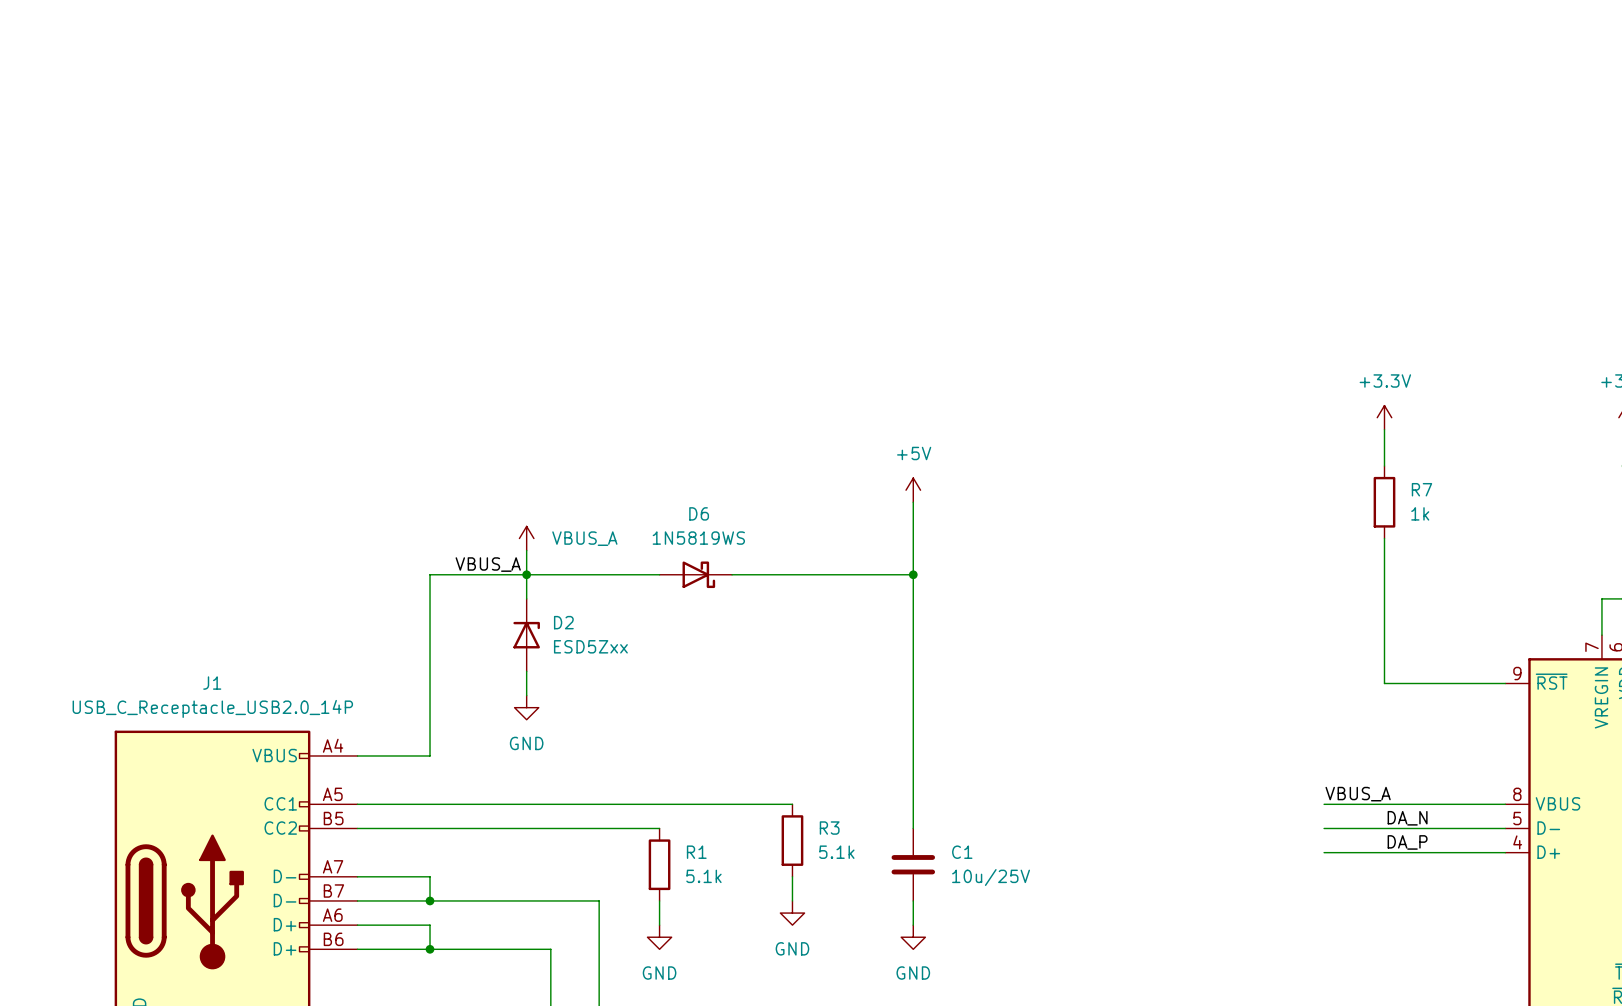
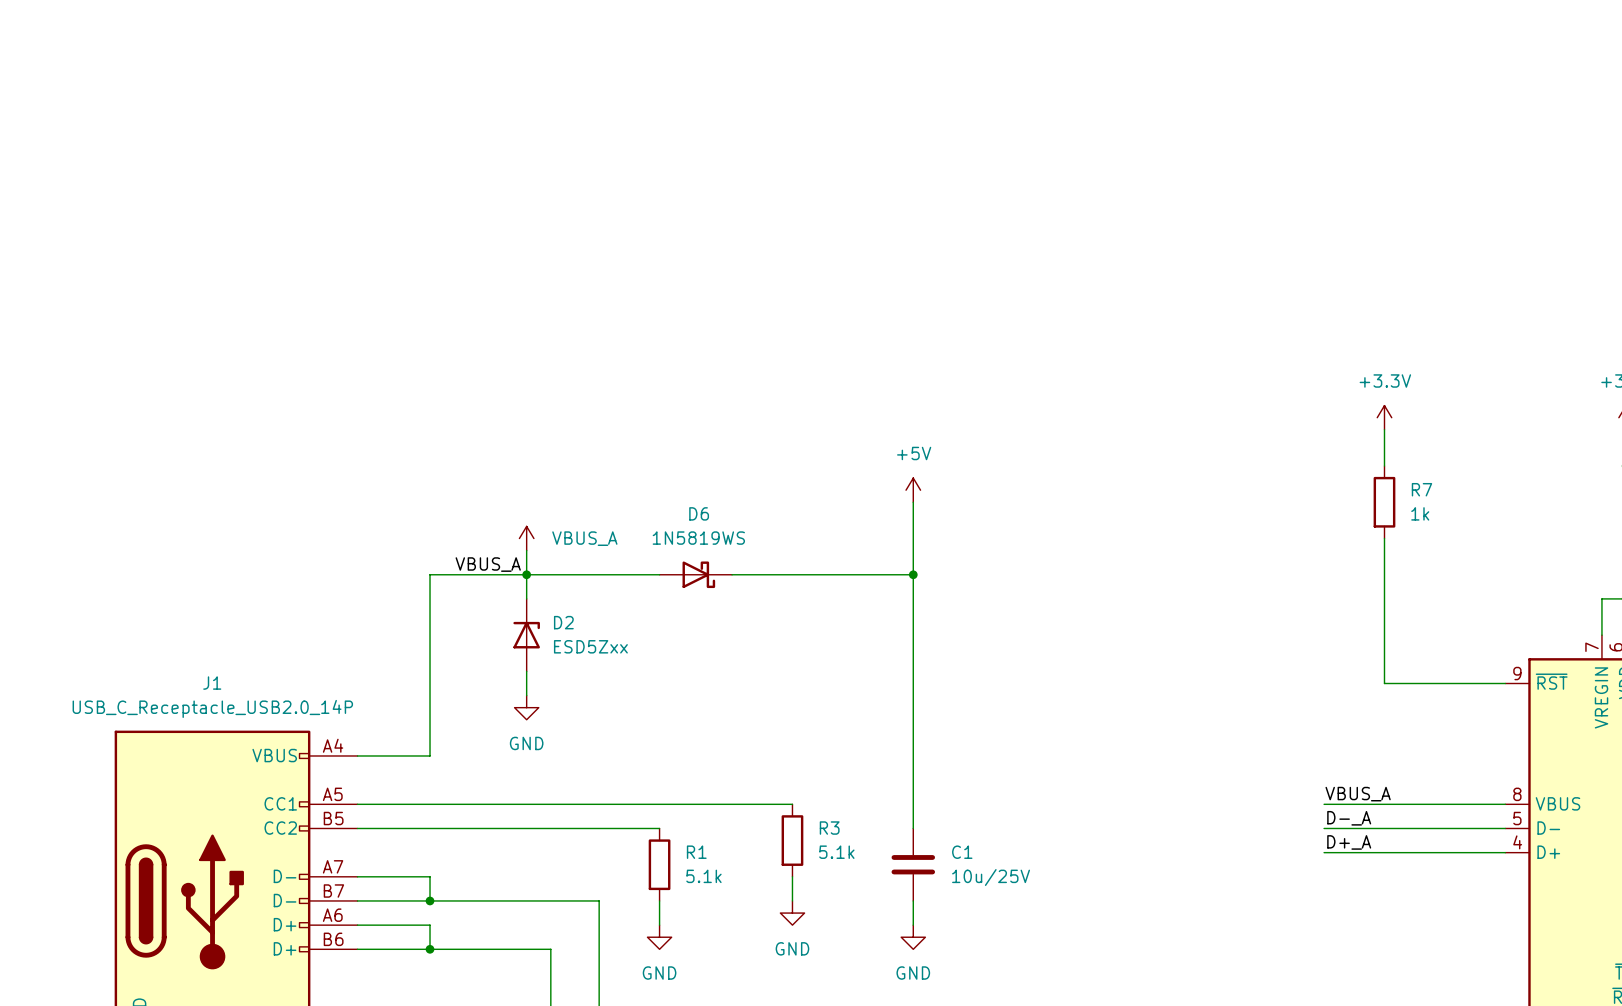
label: none -> D-_A (1349, 818)
label: DA_N (1407, 818) -> none
label: none -> D+_A (1349, 842)
label: DA_P (1407, 842) -> none

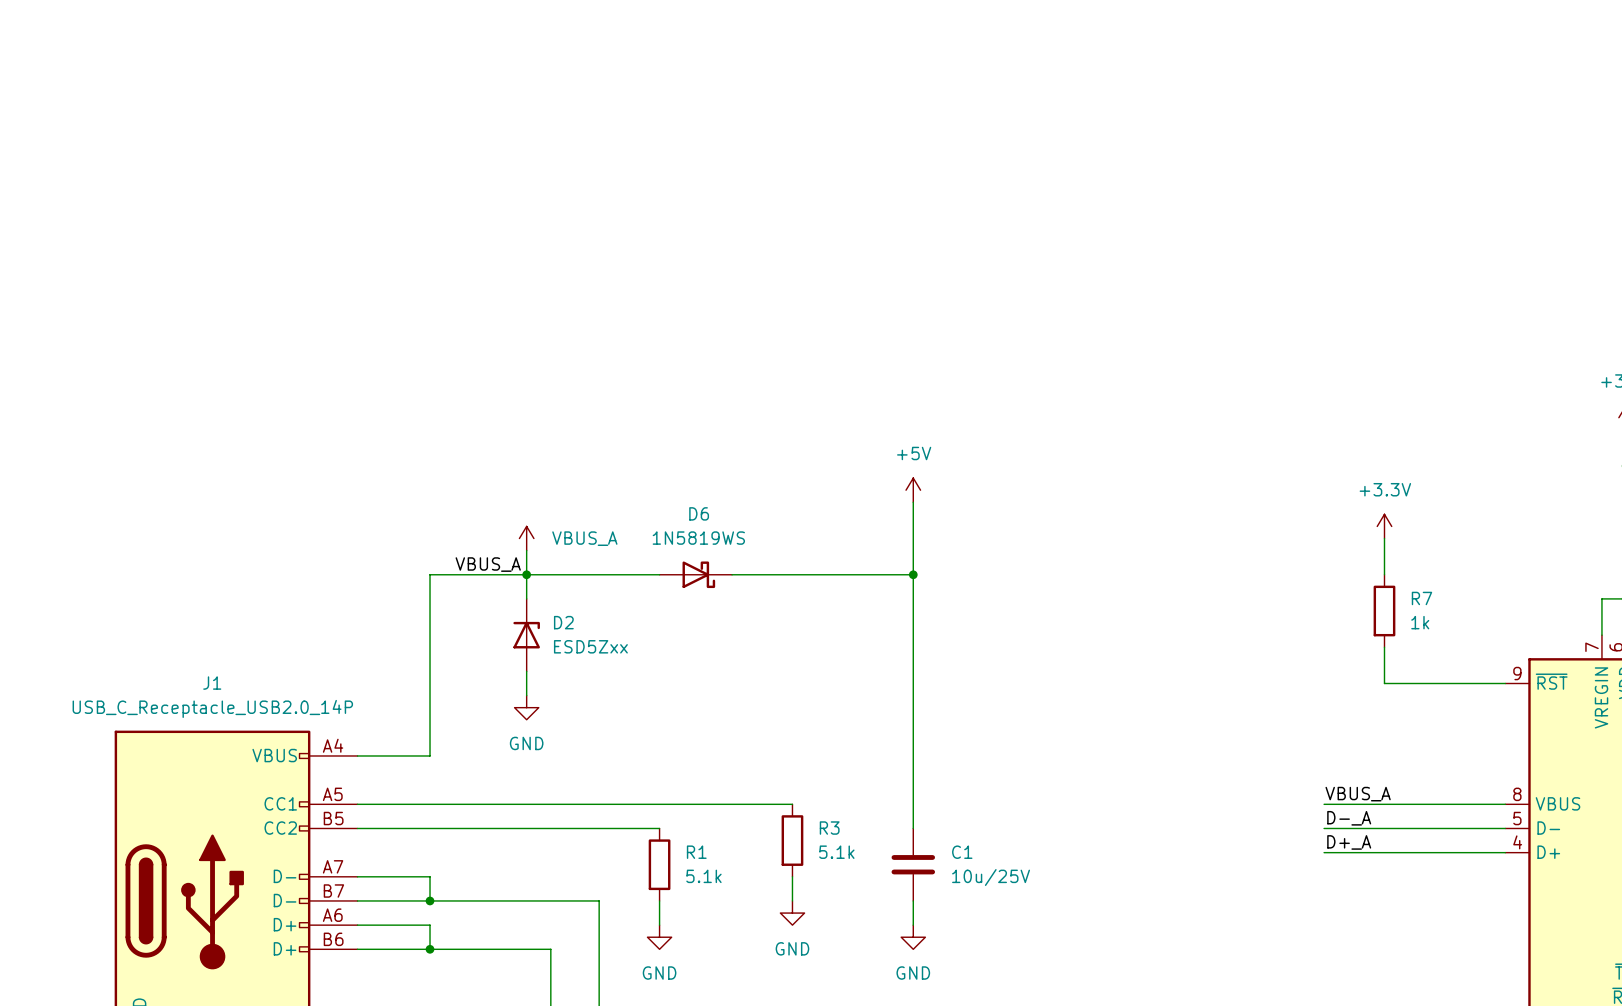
power symbol position: +3.3V (1384, 417) -> +3.3V (1384, 526)
wire: (1384, 429) (1384, 466) -> none
R7 position: (1384, 502) -> (1384, 611)
wire: (1384, 574) (1384, 647) -> none

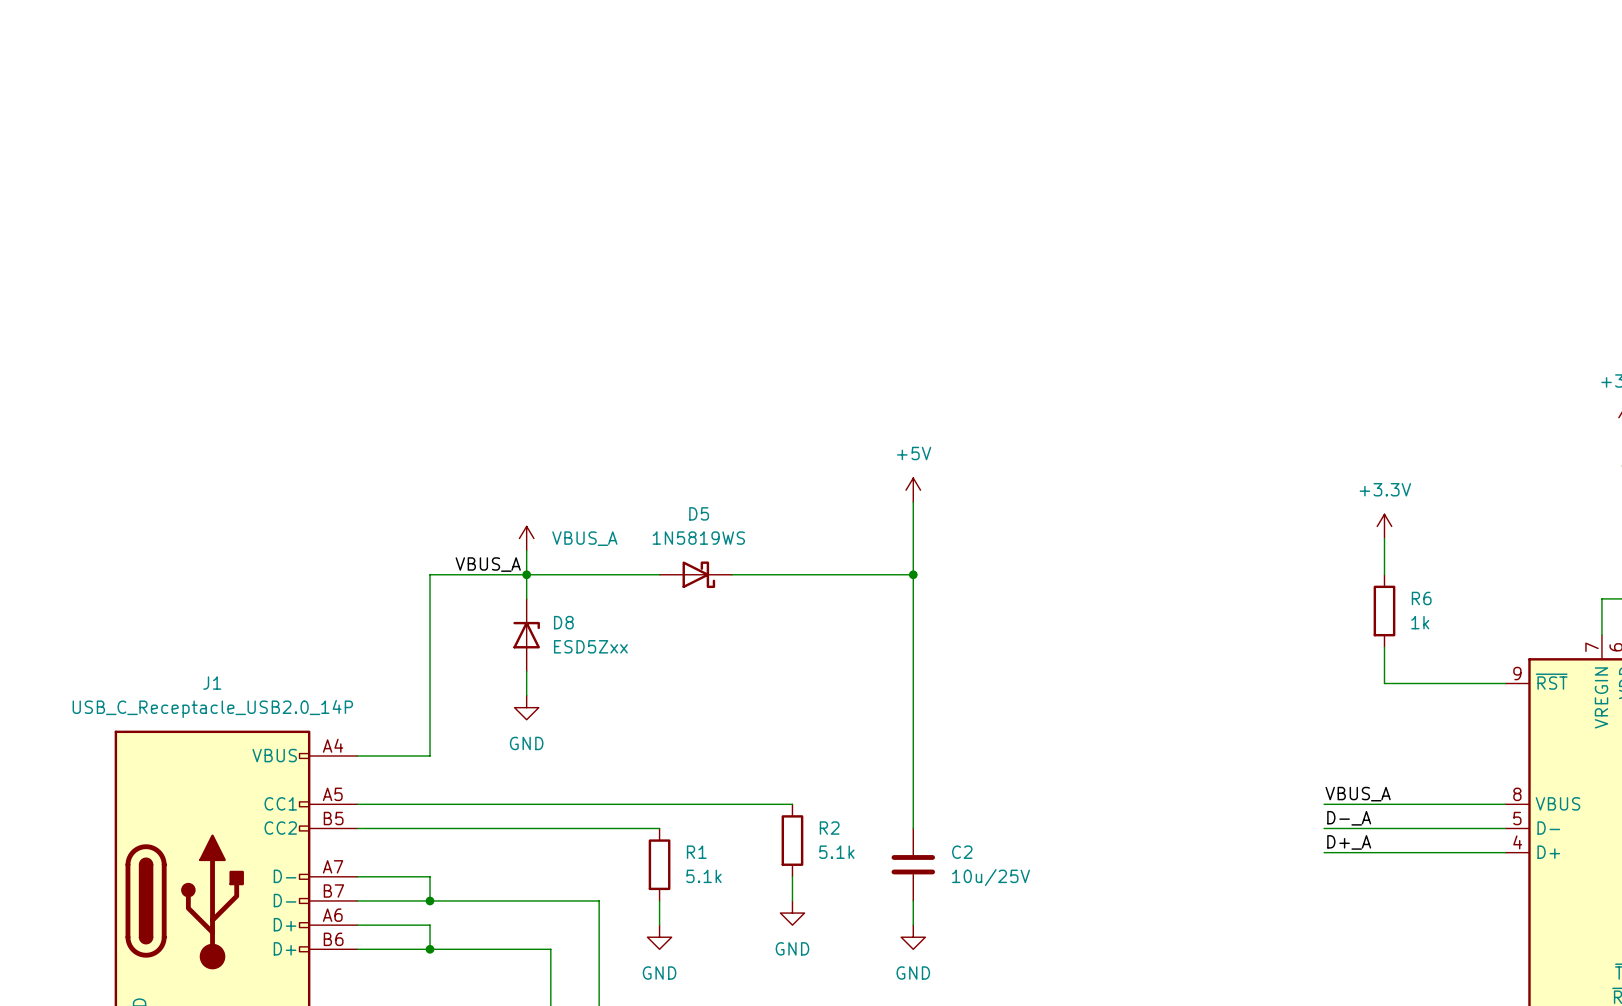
D6 name: D6 (699, 513) -> D5 (699, 513)
R7 name: R7 (1421, 598) -> R6 (1421, 598)
D2 name: D2 (563, 622) -> D8 (563, 622)
R3 name: R3 (829, 828) -> R2 (829, 828)
C1 name: C1 (962, 852) -> C2 (962, 852)

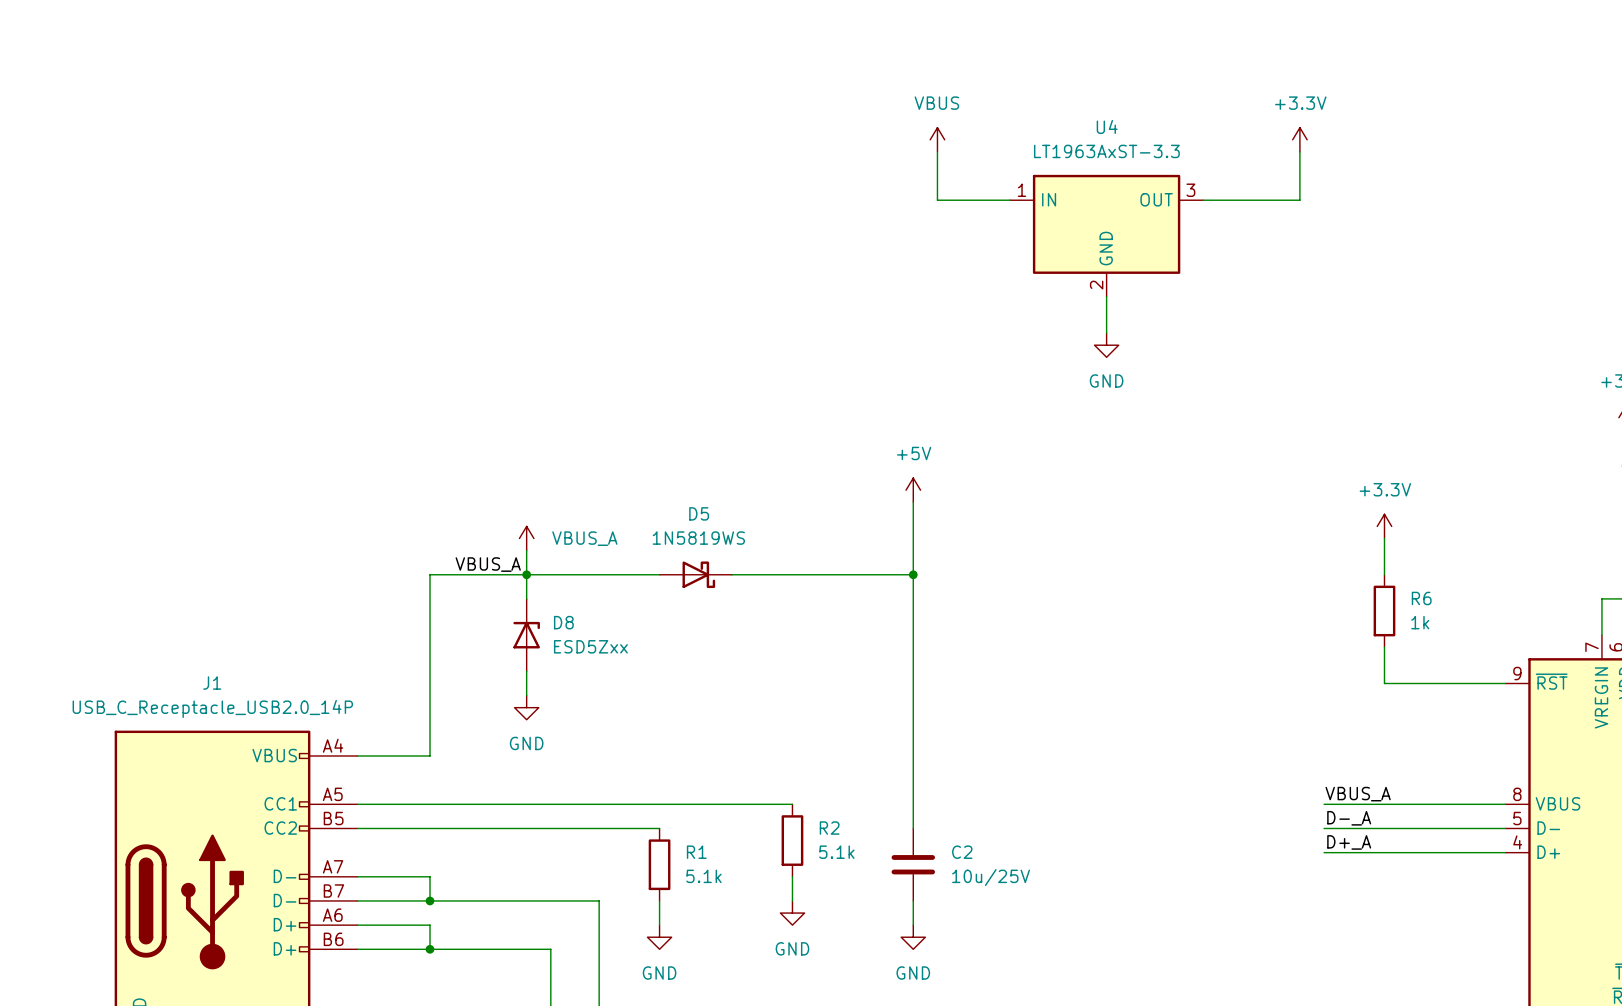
power symbol: none -> VBUS (937, 139)
power symbol: none -> +3.3V (1299, 139)
wire: none -> (937, 151) (937, 200) (1009, 200)
wire: none -> (1299, 151) (1299, 200) (1203, 200)
U4: none -> LT1963AxST-3.3 (1106, 235)
wire: none -> (1106, 296) (1106, 333)
power symbol: none -> GND (1106, 345)

